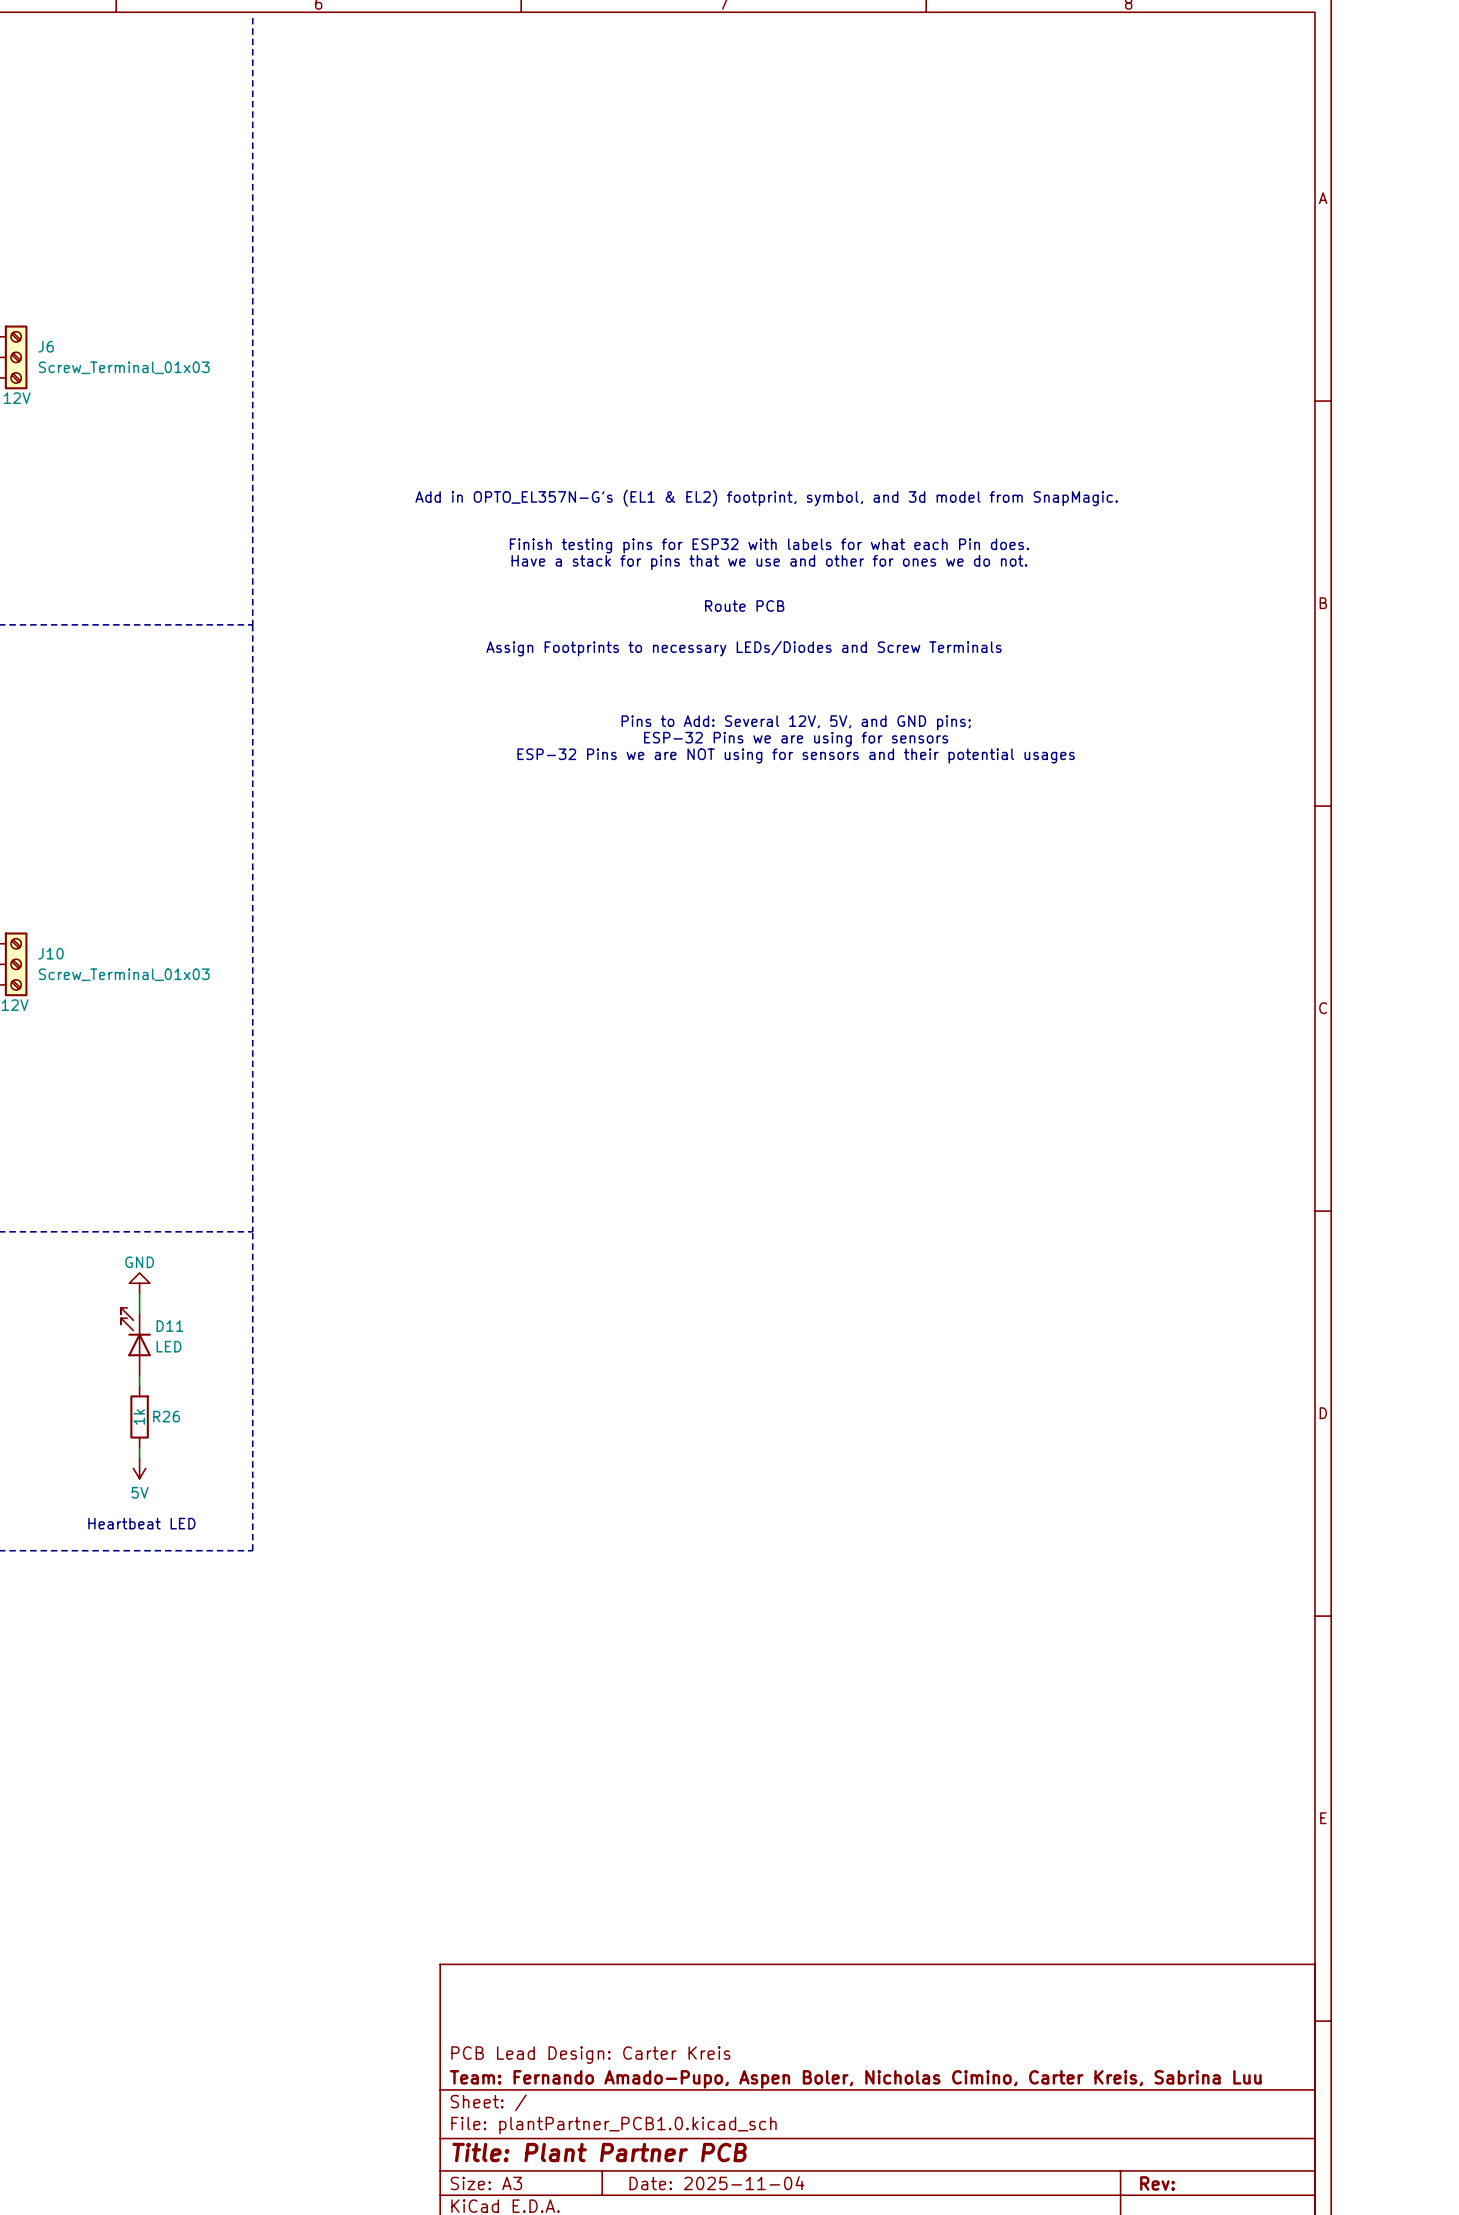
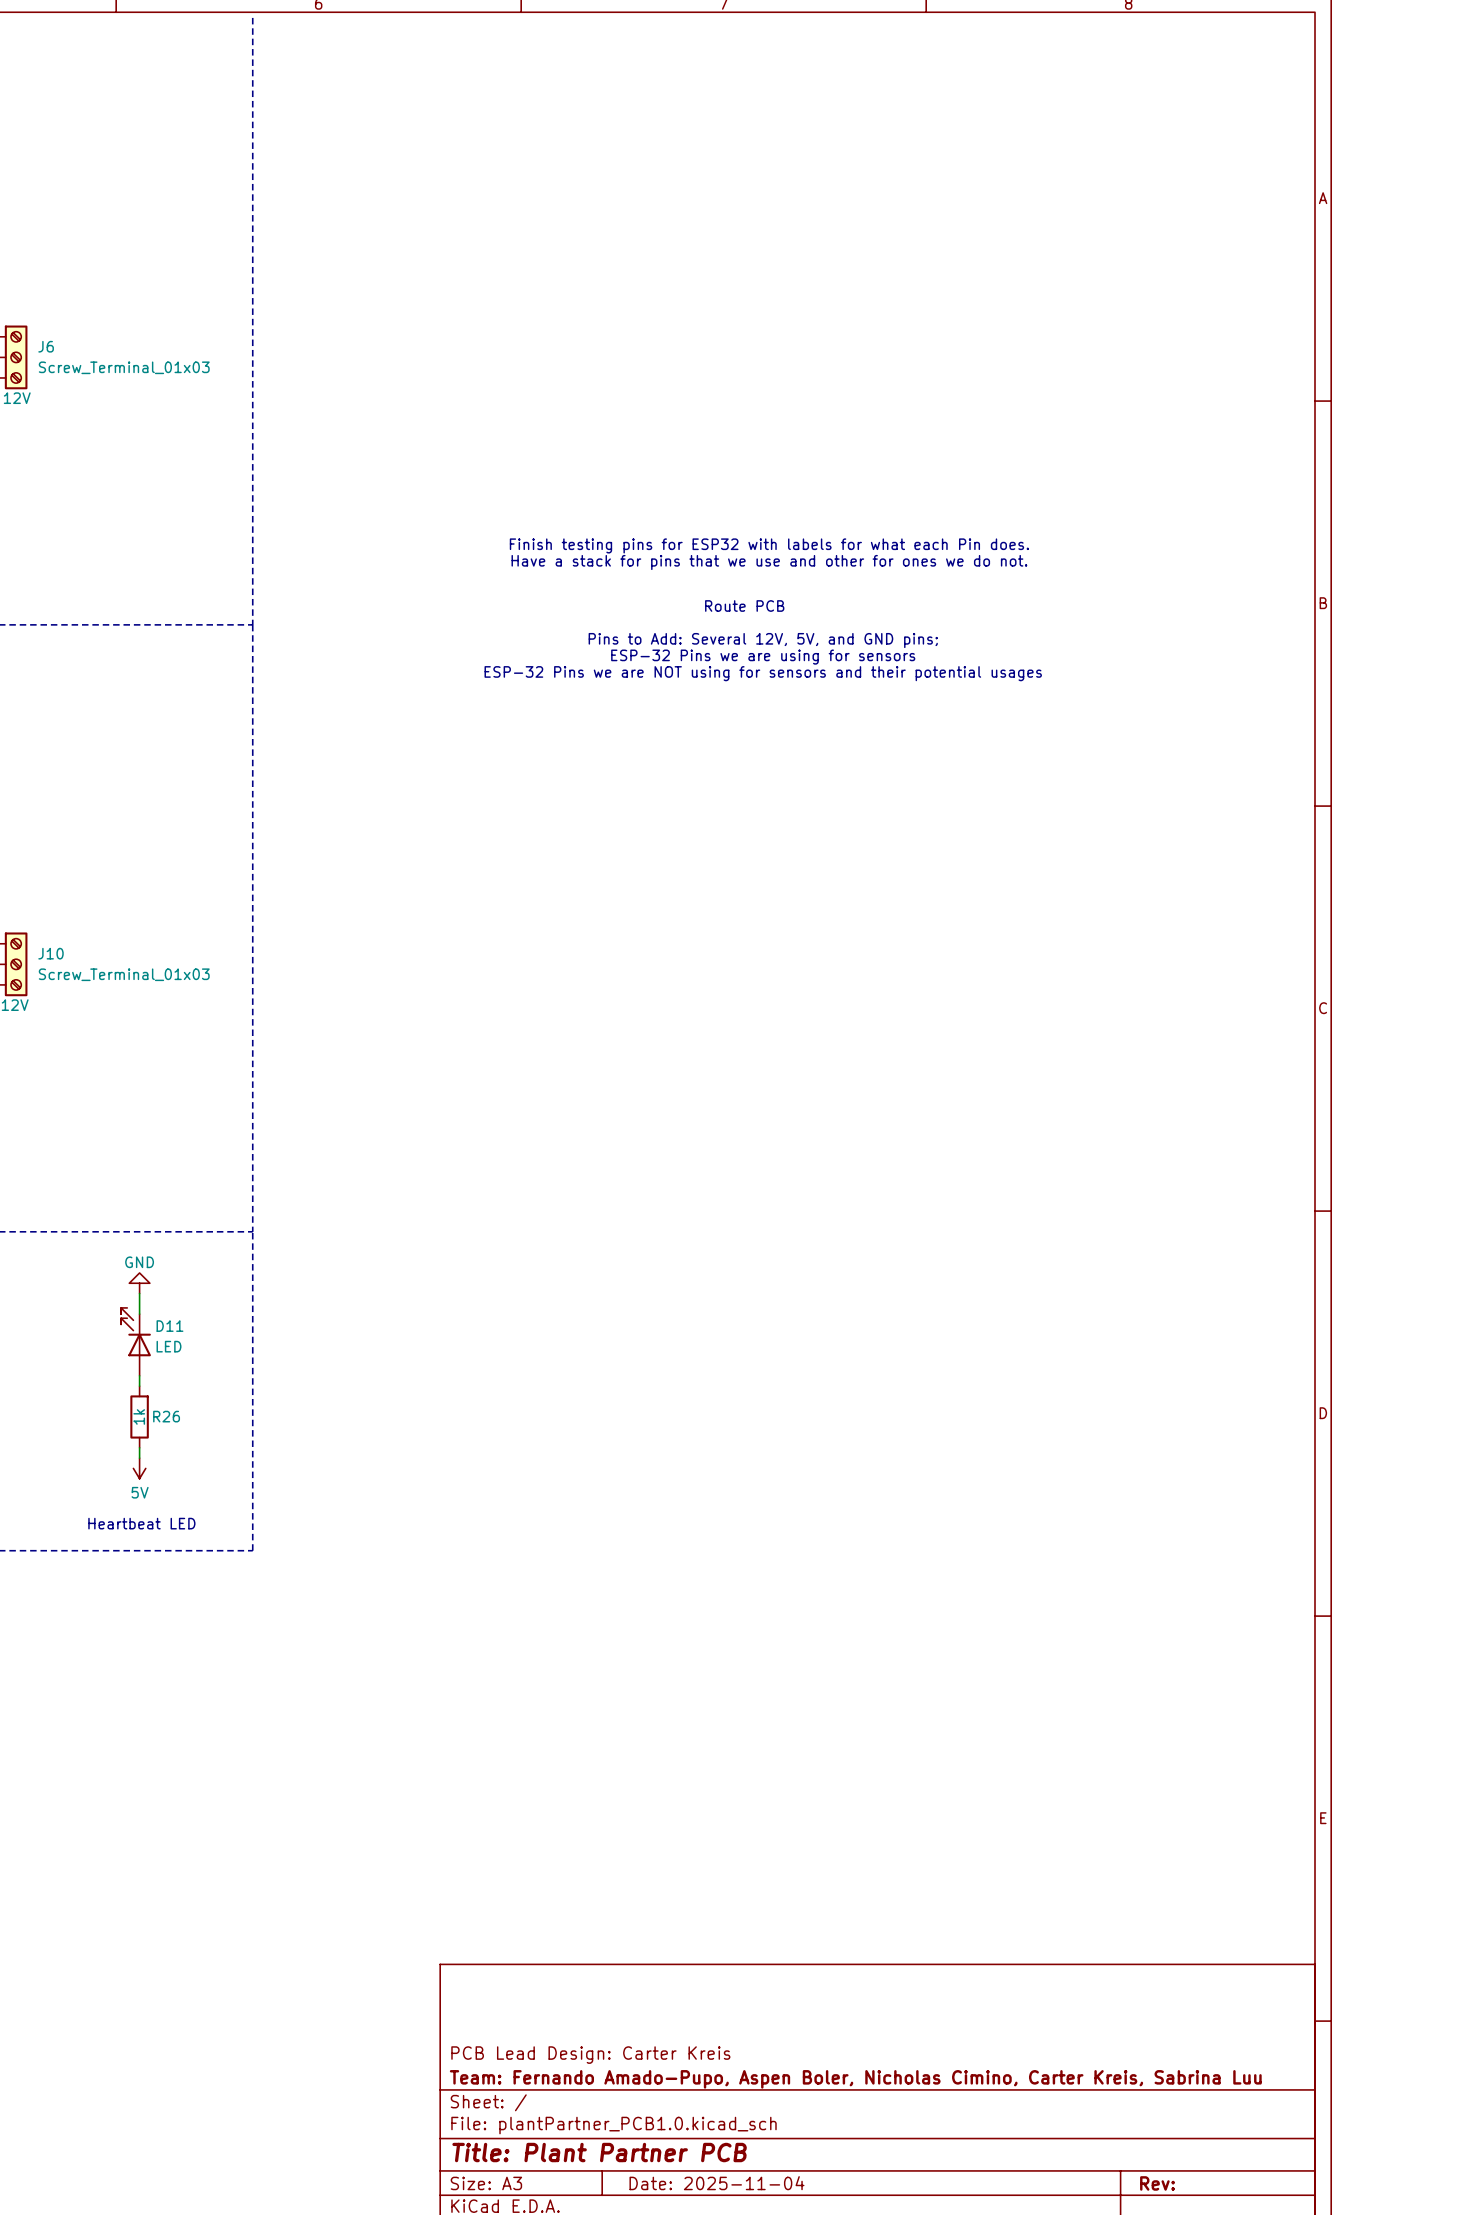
text: Add in OPTO_EL357N-G's (EL1 & EL2) footprint, symbol, and 3d model from SnapMagic. (766, 498) -> none
text: Assign Footprints to necessary LEDs/Diodes and Screw Terminals (743, 648) -> none
text position: Pins to Add: Several 12V, 5V, and GND pins; (796, 722) -> Pins to Add: Several 12V, 5V, and GND pins; (763, 640)
text position: ESP-32 Pins we are using for sensors (796, 739) -> ESP-32 Pins we are using for sensors (763, 657)
text position: ESP-32 Pins we are NOT using for sensors and their potential usages (796, 755) -> ESP-32 Pins we are NOT using for sensors and their potential usages (763, 673)

